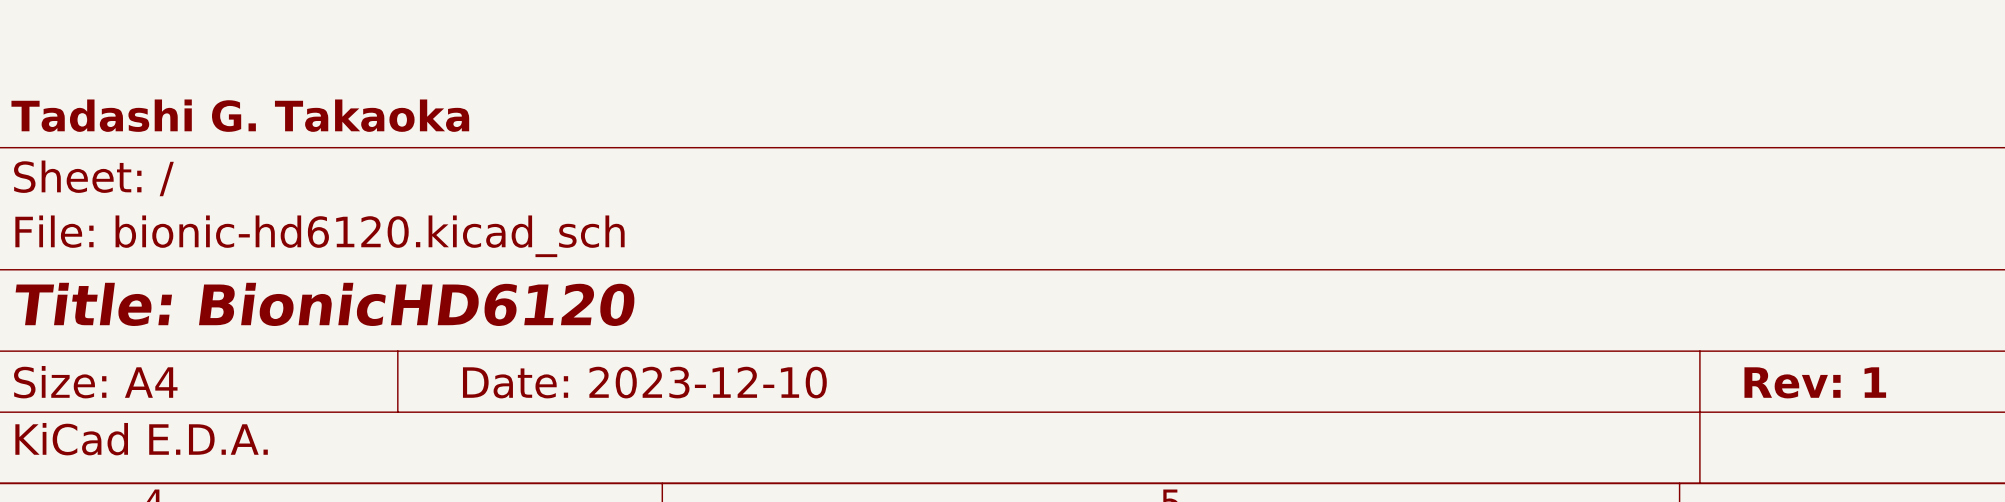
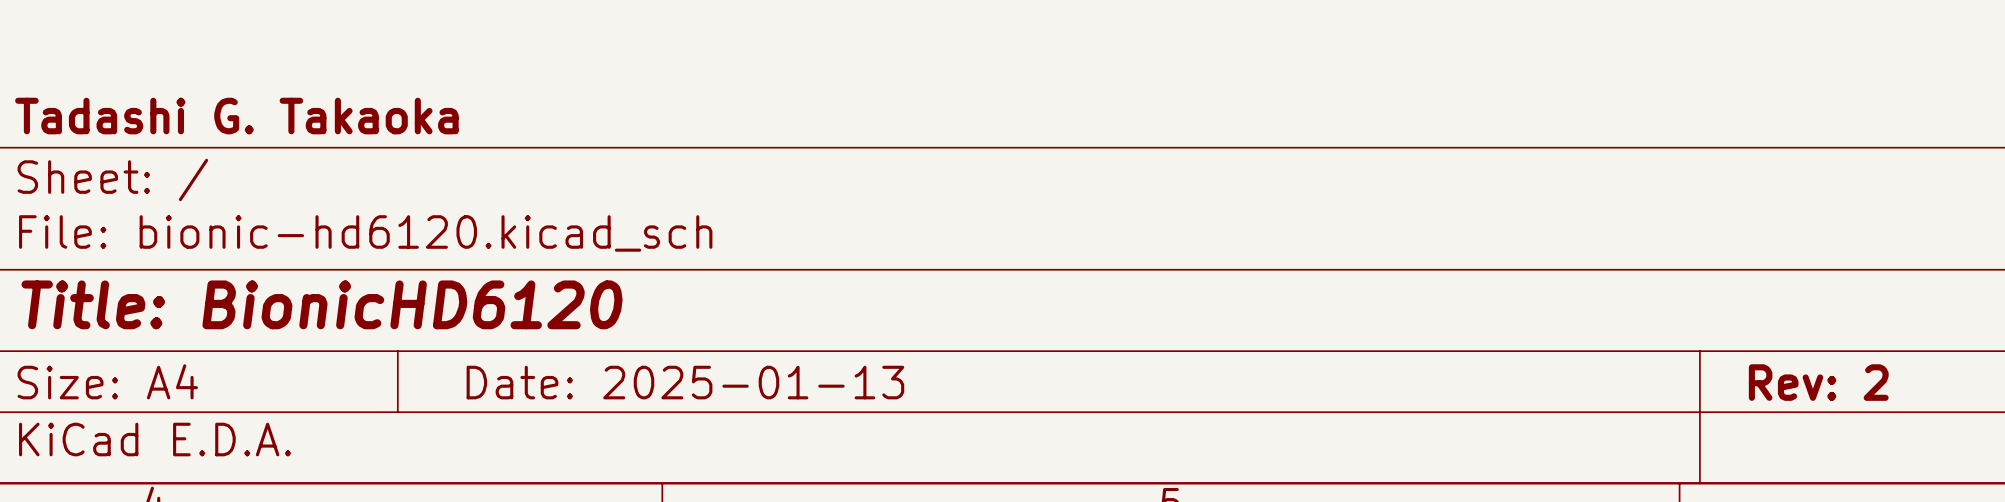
title block: Date: 2023-12-10 (644, 382) -> Date: 2025-01-13 (685, 382)
title block: Rev: 1 (1815, 382) -> Rev: 2 (1818, 382)

